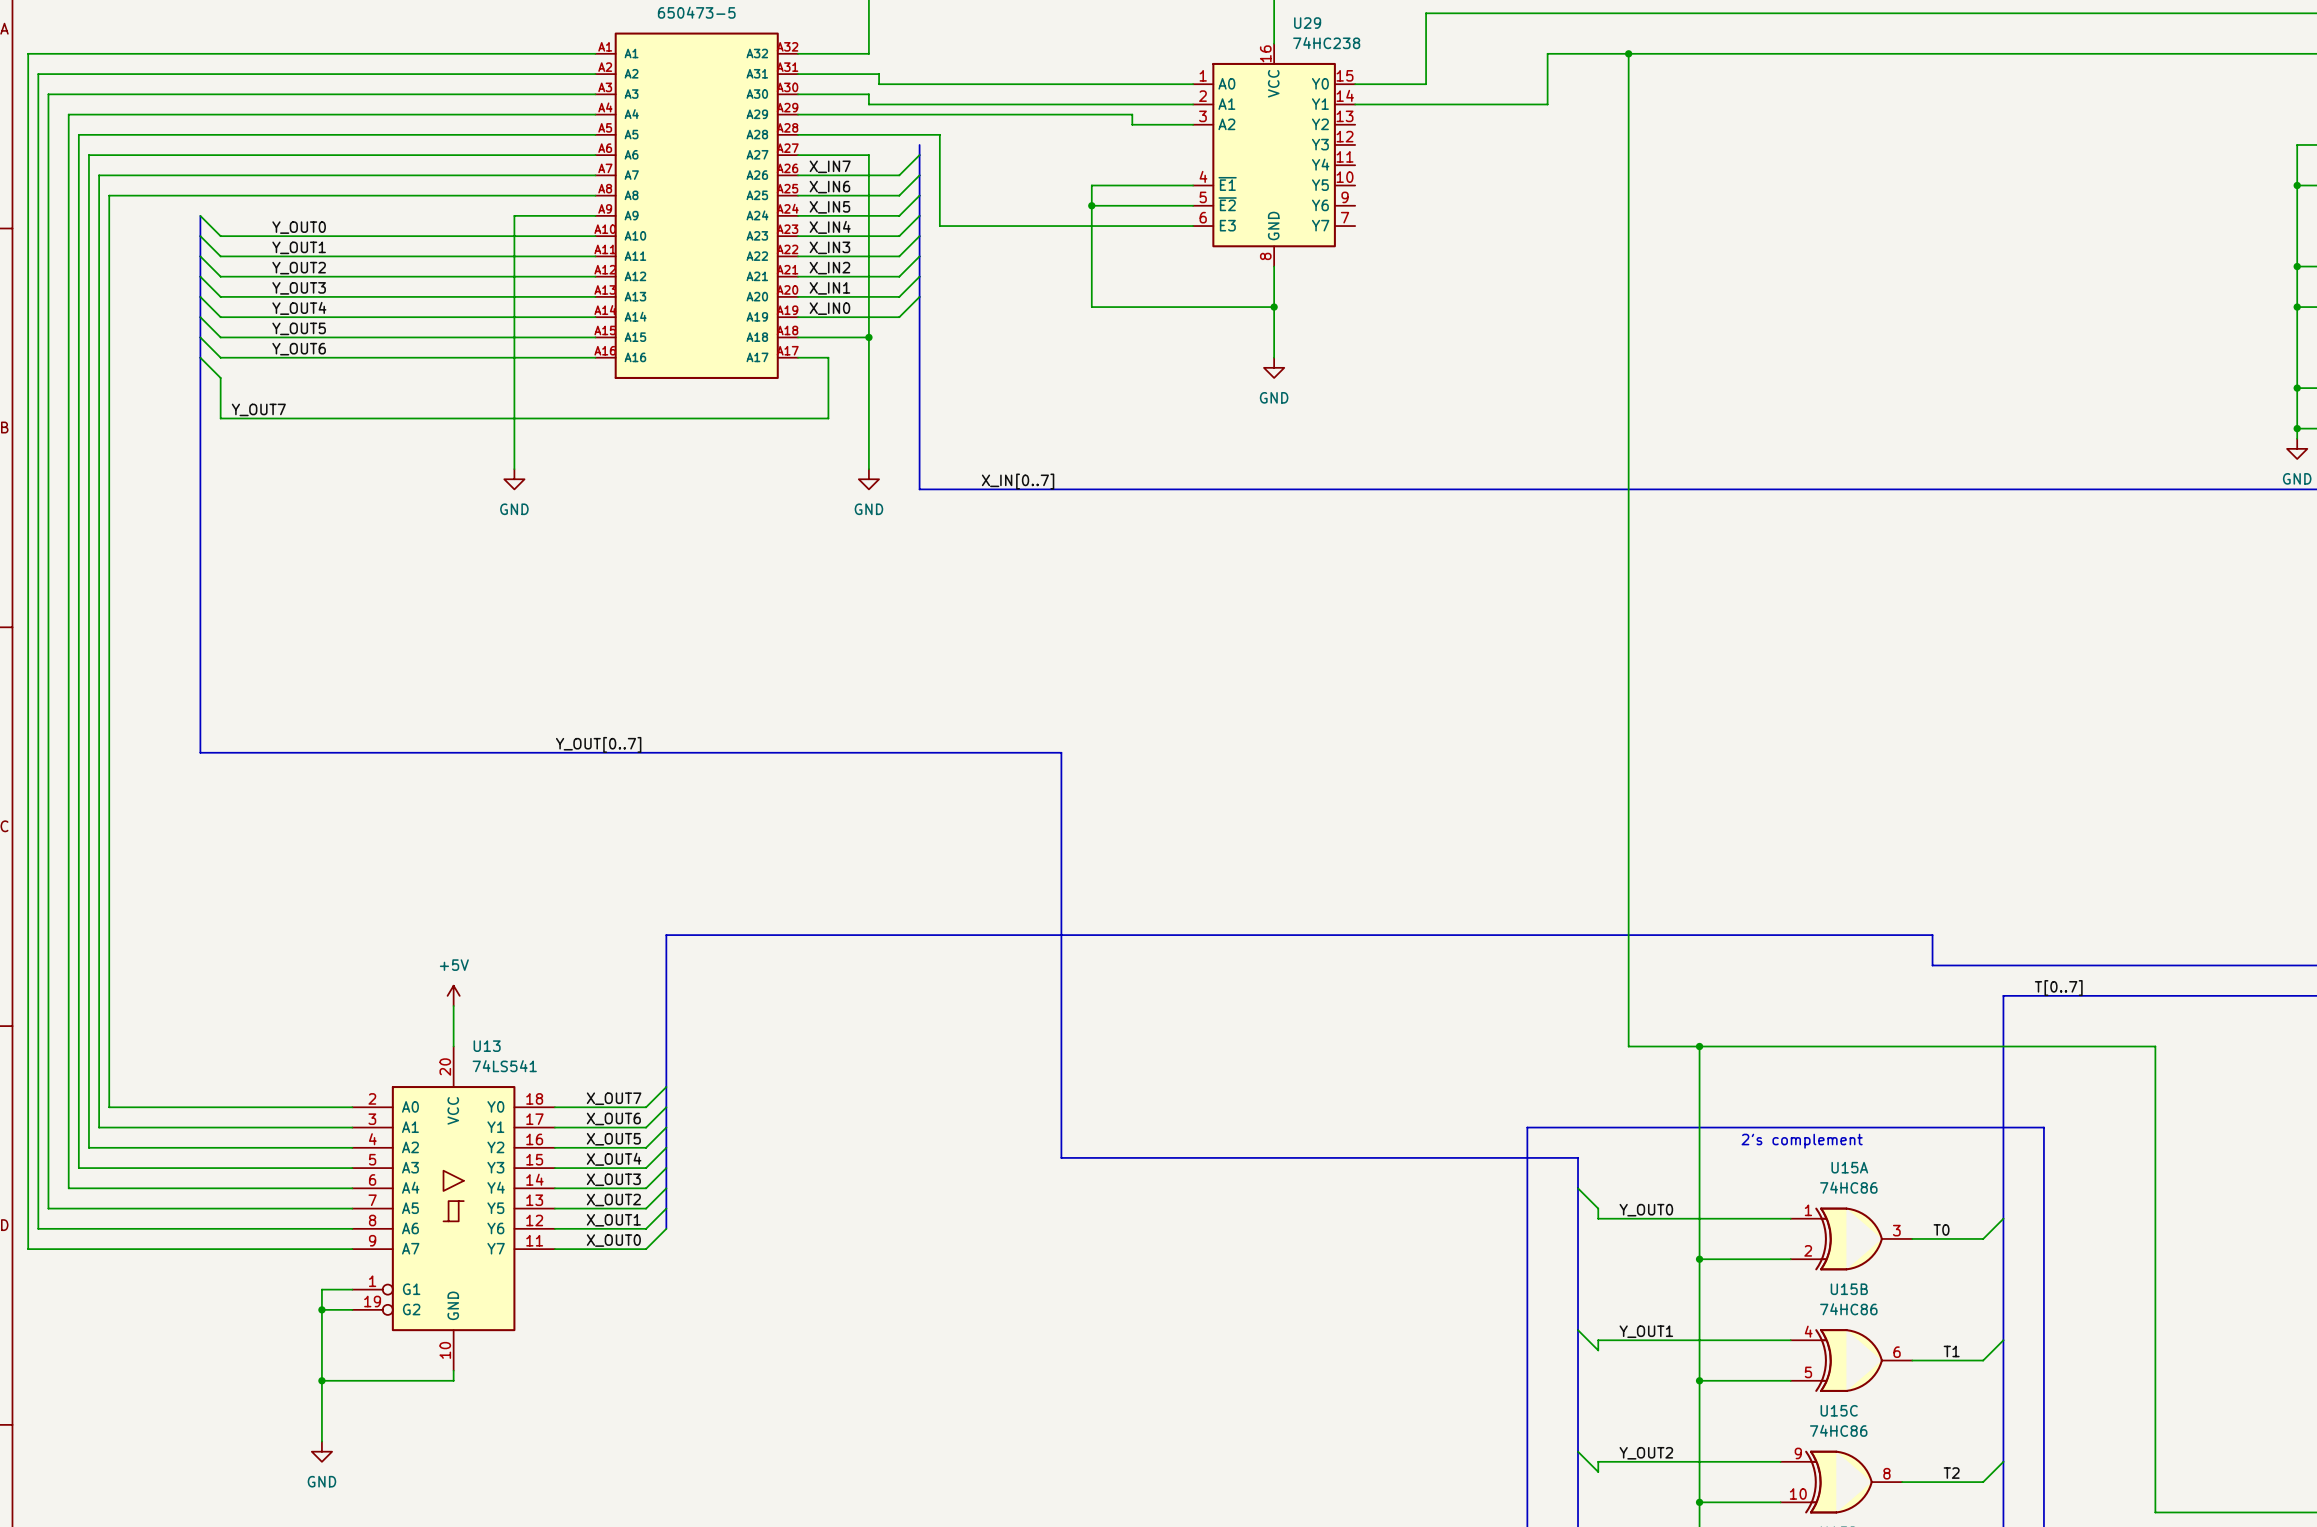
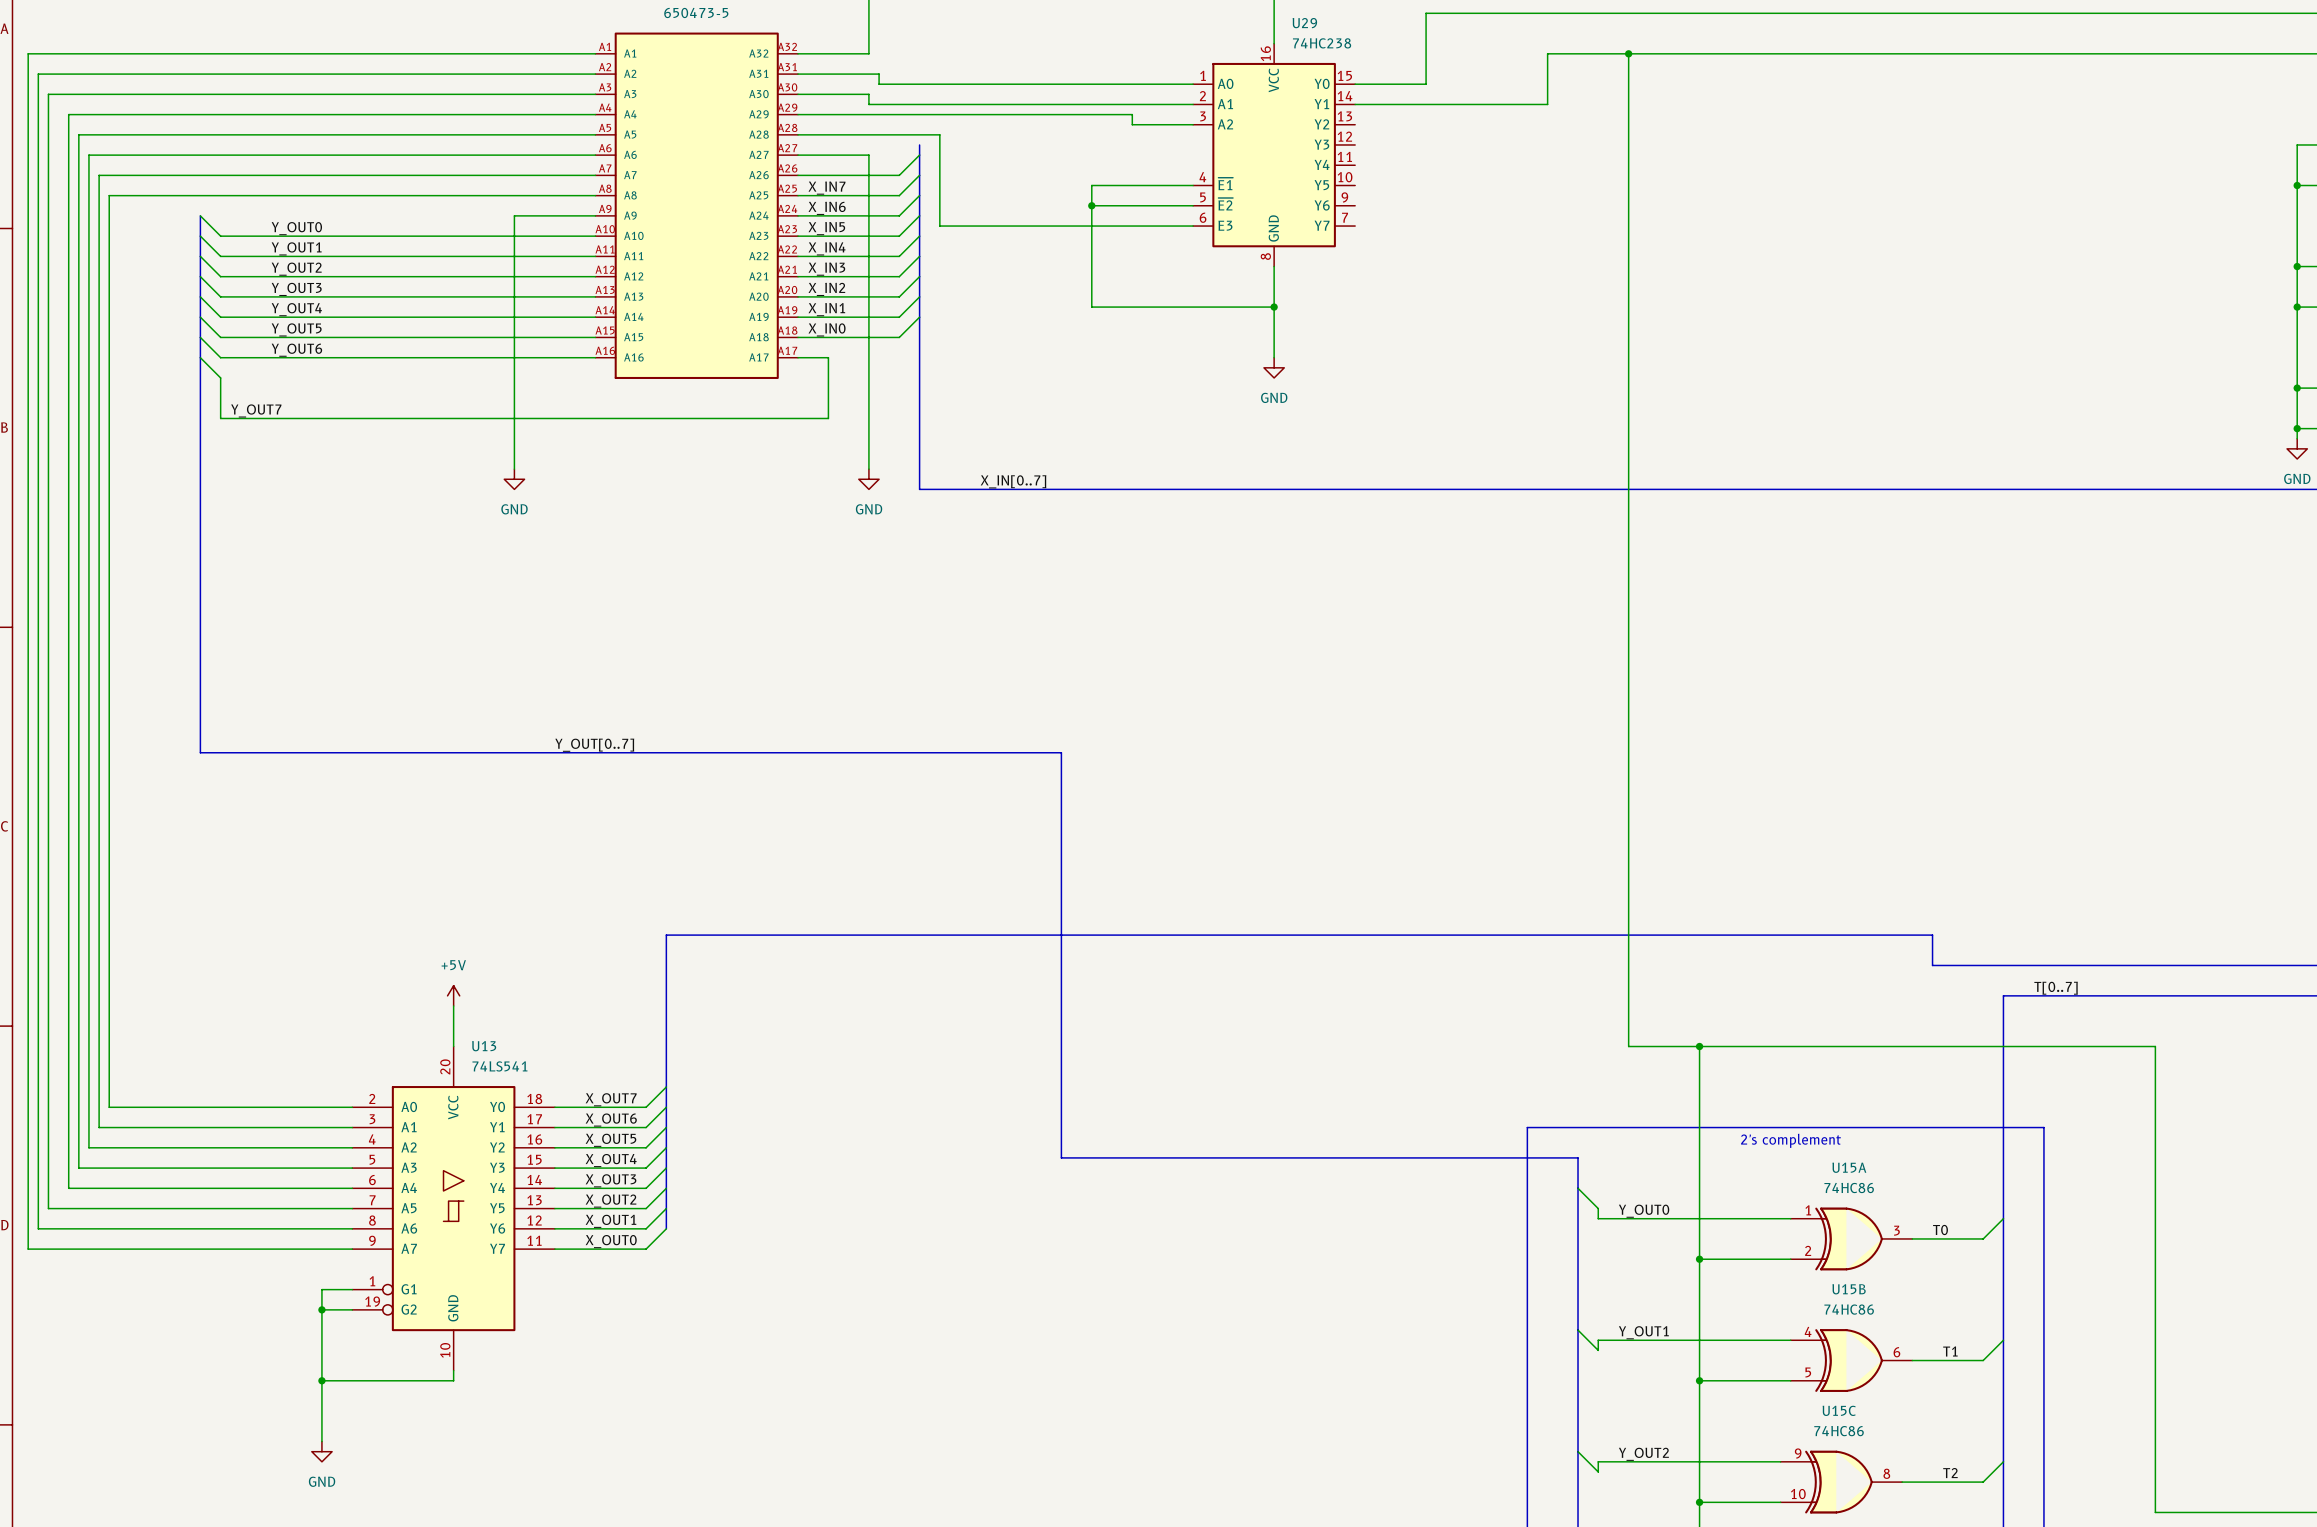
label: X_IN7 (830, 166) -> none
label: X_IN6 (829, 187) -> X_IN7 (827, 188)
label: X_IN5 (829, 207) -> X_IN6 (827, 208)
label: X_IN4 (830, 227) -> X_IN5 (826, 228)
label: X_IN3 (829, 247) -> X_IN4 (827, 248)
label: X_IN2 (829, 268) -> X_IN3 (826, 269)
label: X_IN1 (829, 288) -> X_IN2 (826, 289)
label: X_IN0 (829, 308) -> X_IN1 (826, 309)
wire: none -> (919, 317) (899, 337) (868, 337)
label: none -> X_IN0 (827, 329)
junction: (868, 337) -> none

